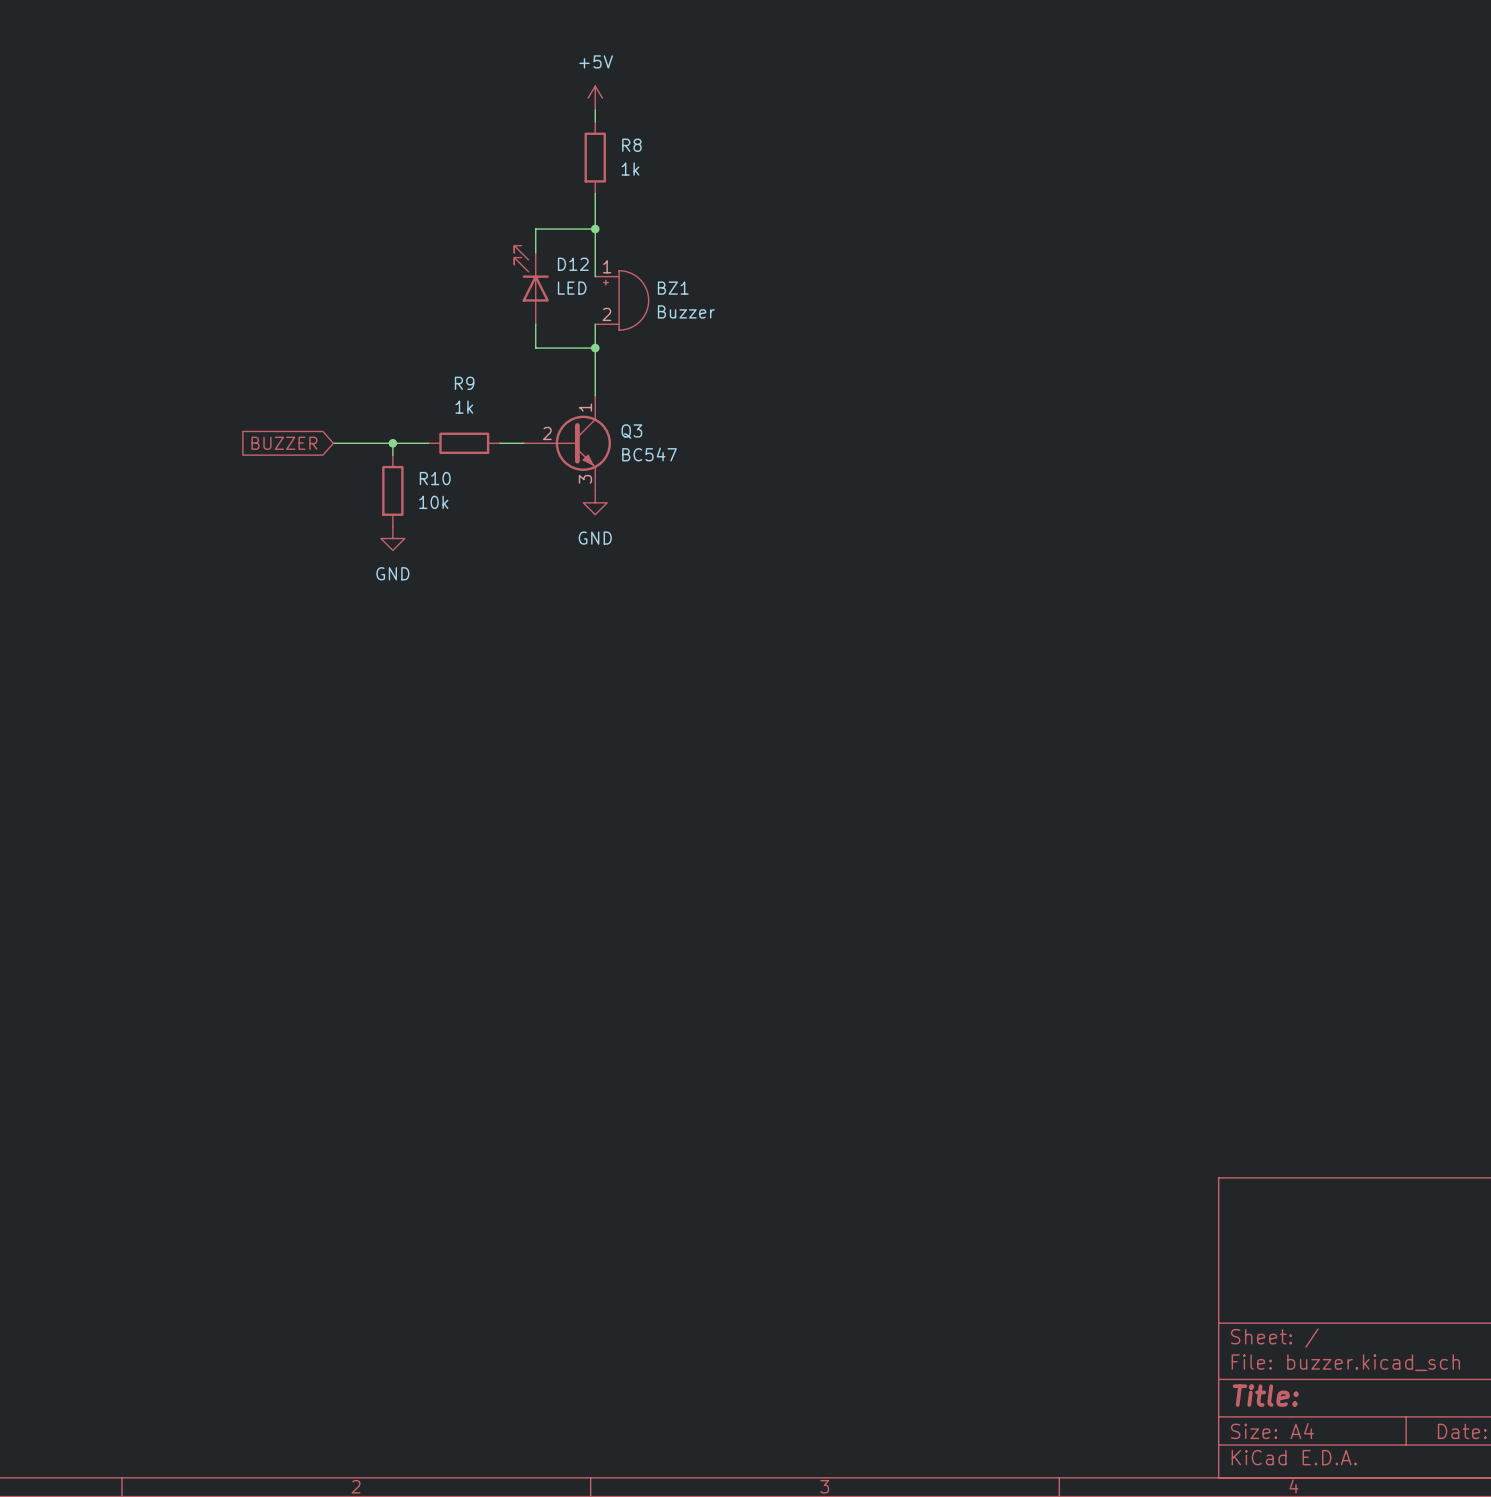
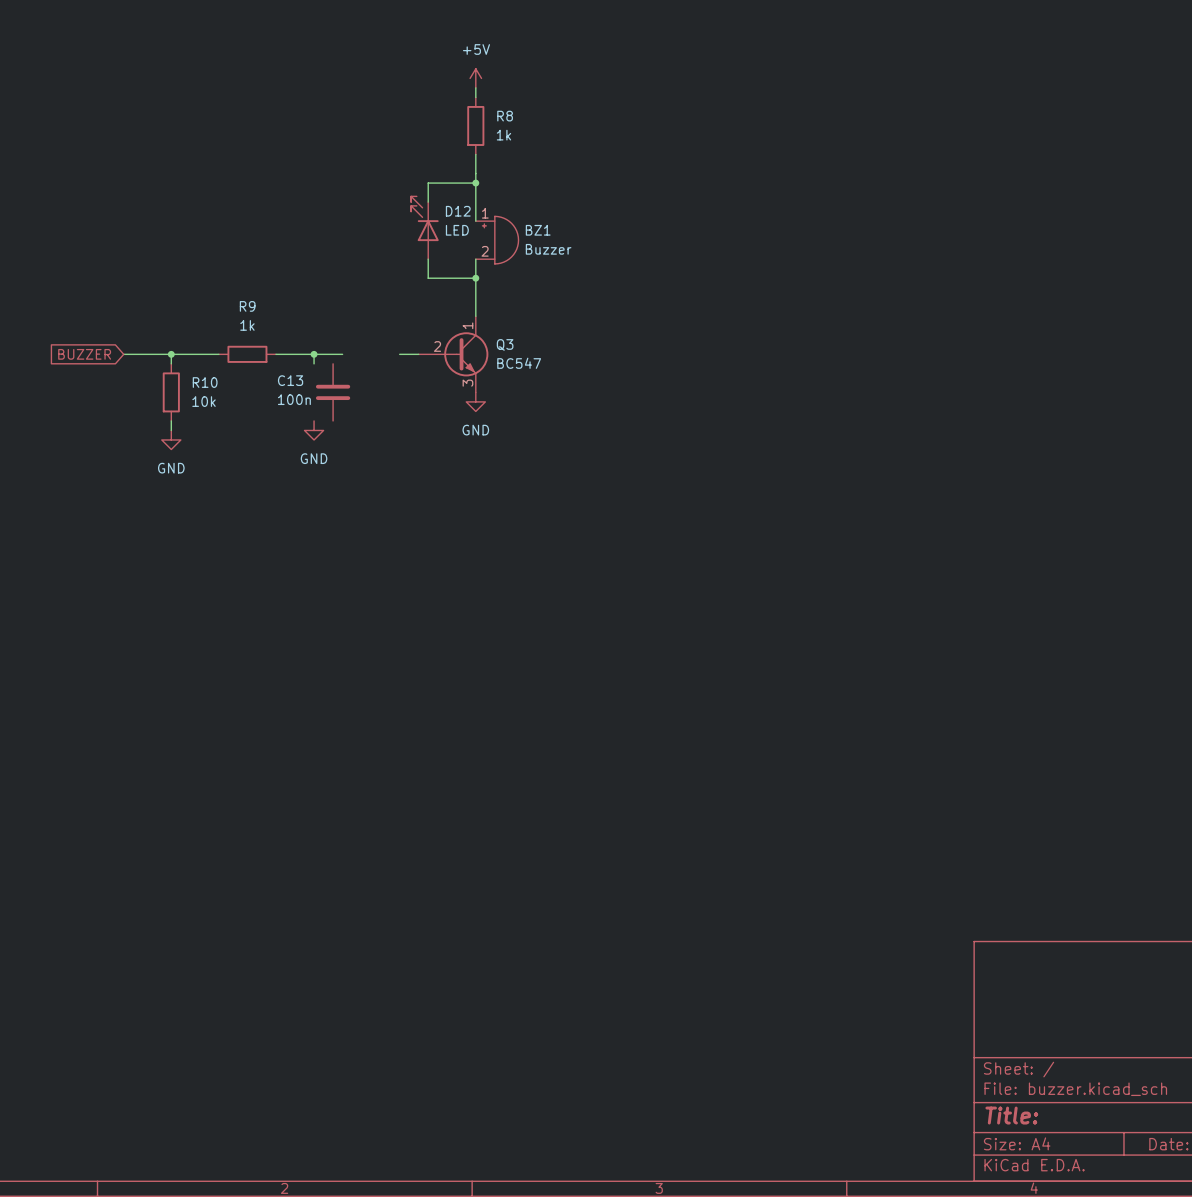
wire: none -> (123, 354) (218, 354)
wire: none -> (171, 354) (171, 363)
junction: none -> (171, 354)
global label position: BUZZER (284, 443) -> BUZZER (84, 354)
R9 position: (464, 443) -> (247, 354)
R10 position: (392, 490) -> (171, 392)
C13: none -> 100n (333, 392)
wire: none -> (171, 420) (171, 430)
power symbol: none -> GND (171, 439)

